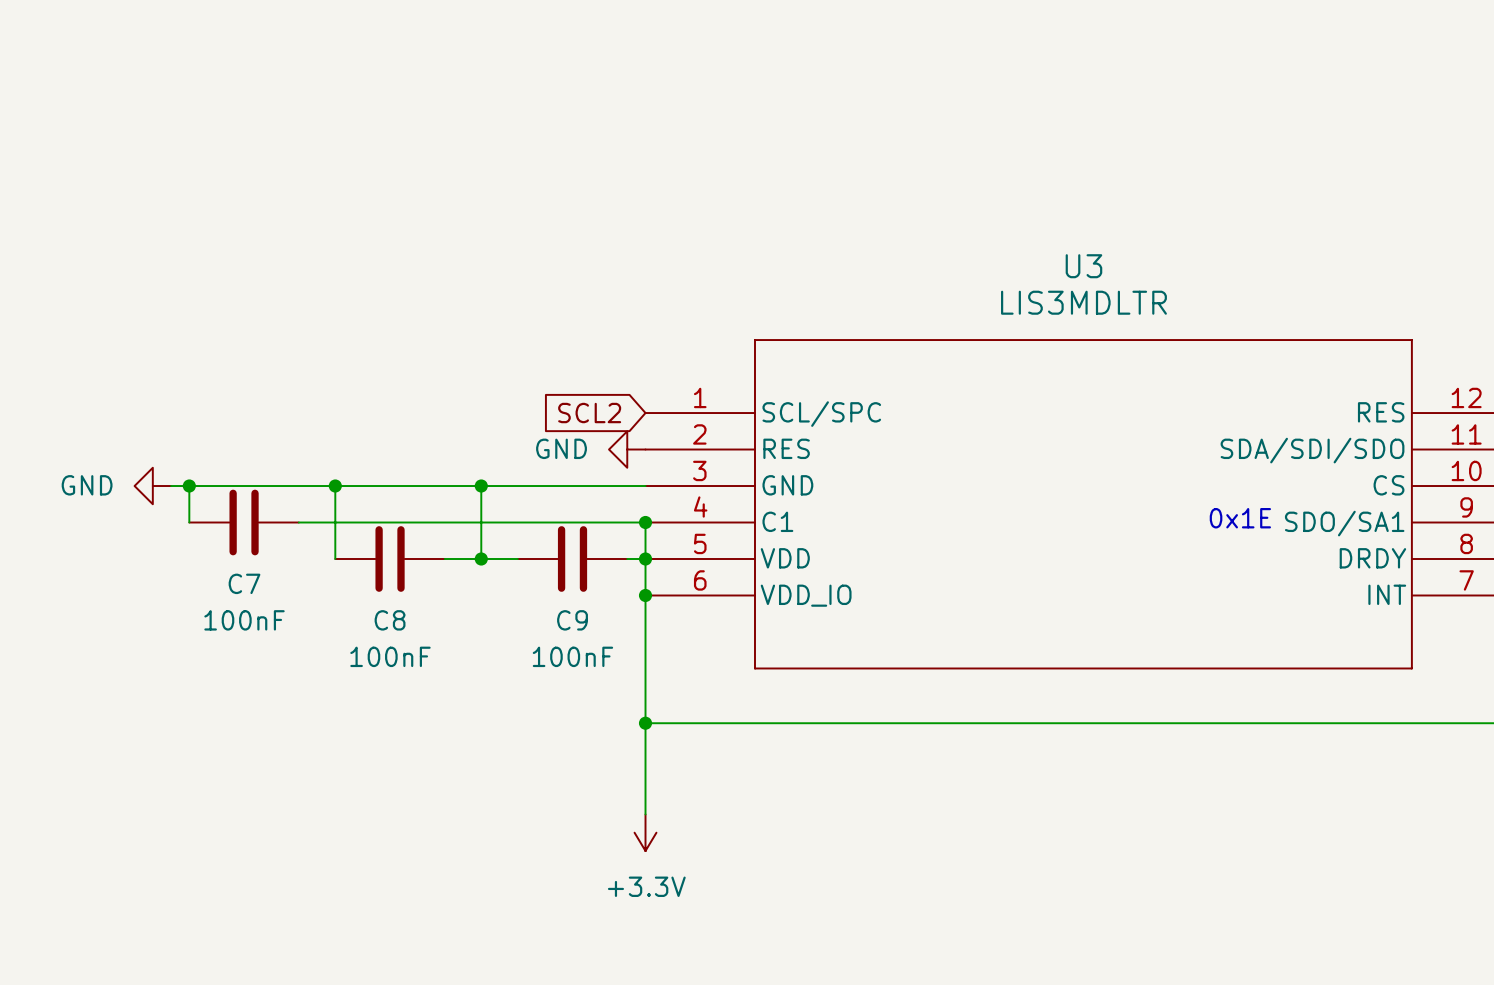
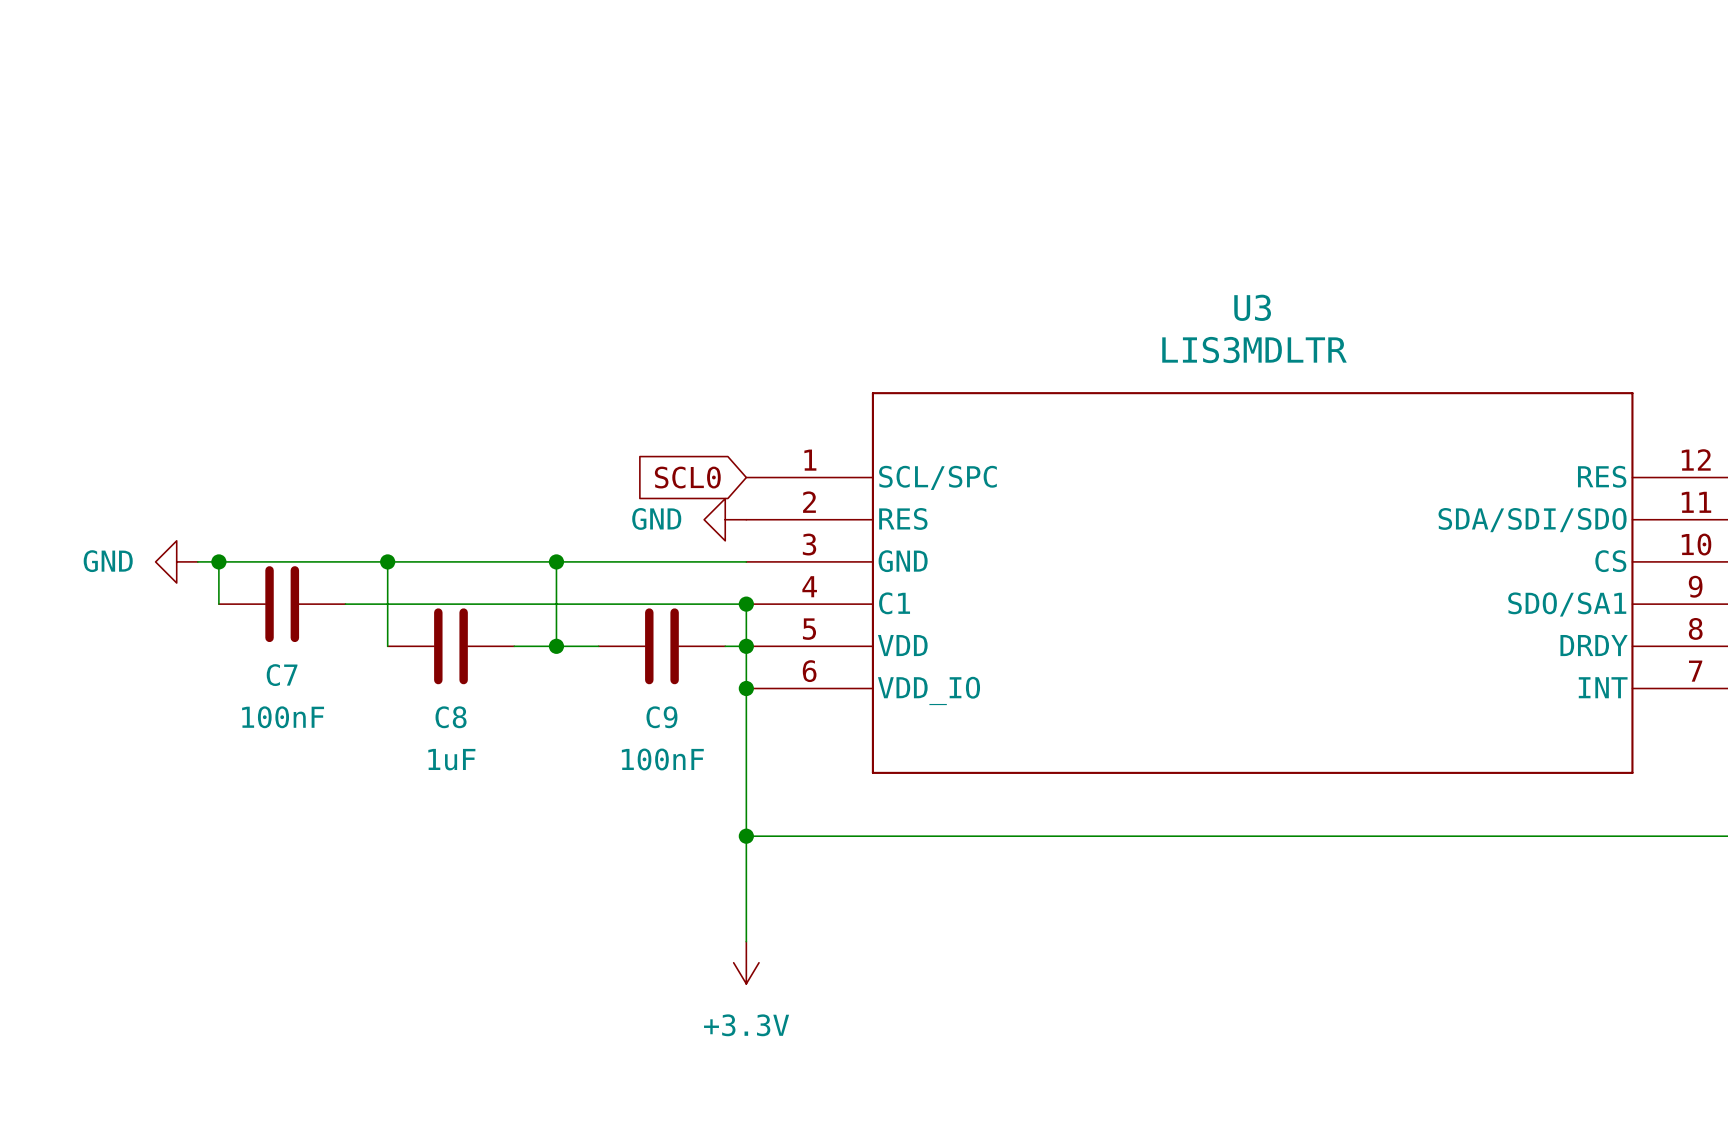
global label: SCL2 (589, 413) -> SCL0 (687, 477)
text: 0x1E (1240, 518) -> none
C8 value: 100nF (390, 656) -> 1uF (451, 759)

